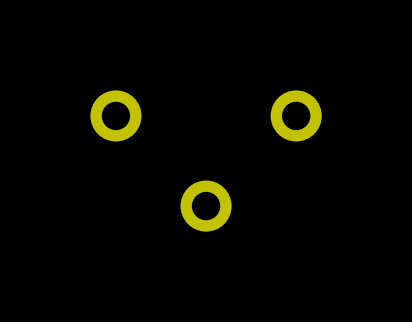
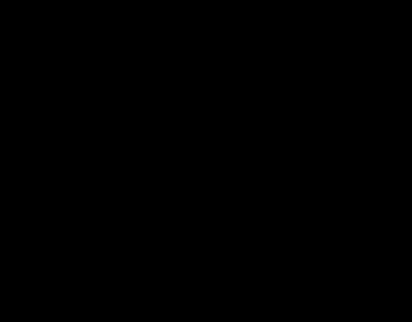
part: (206, 161) -> none

